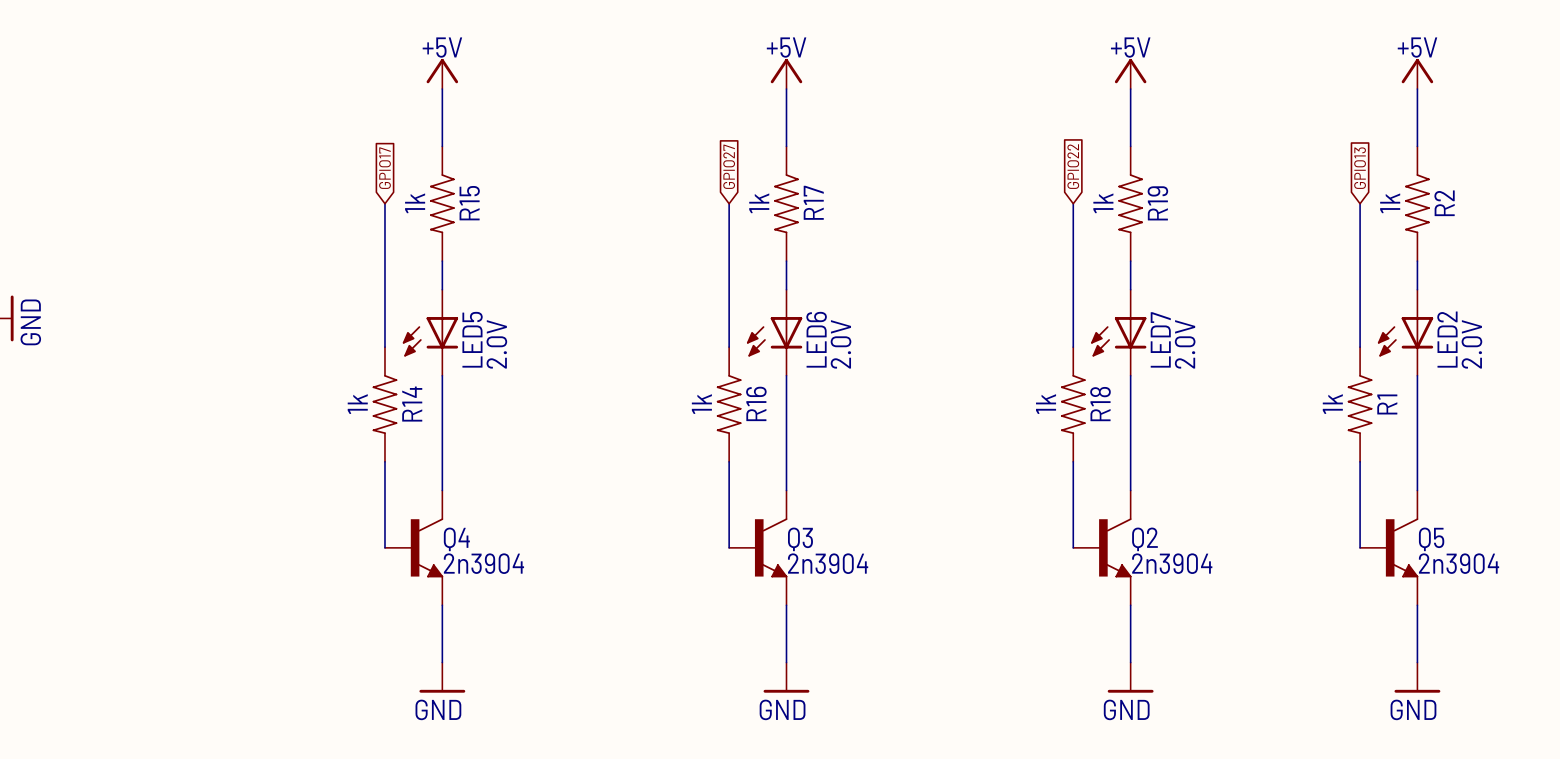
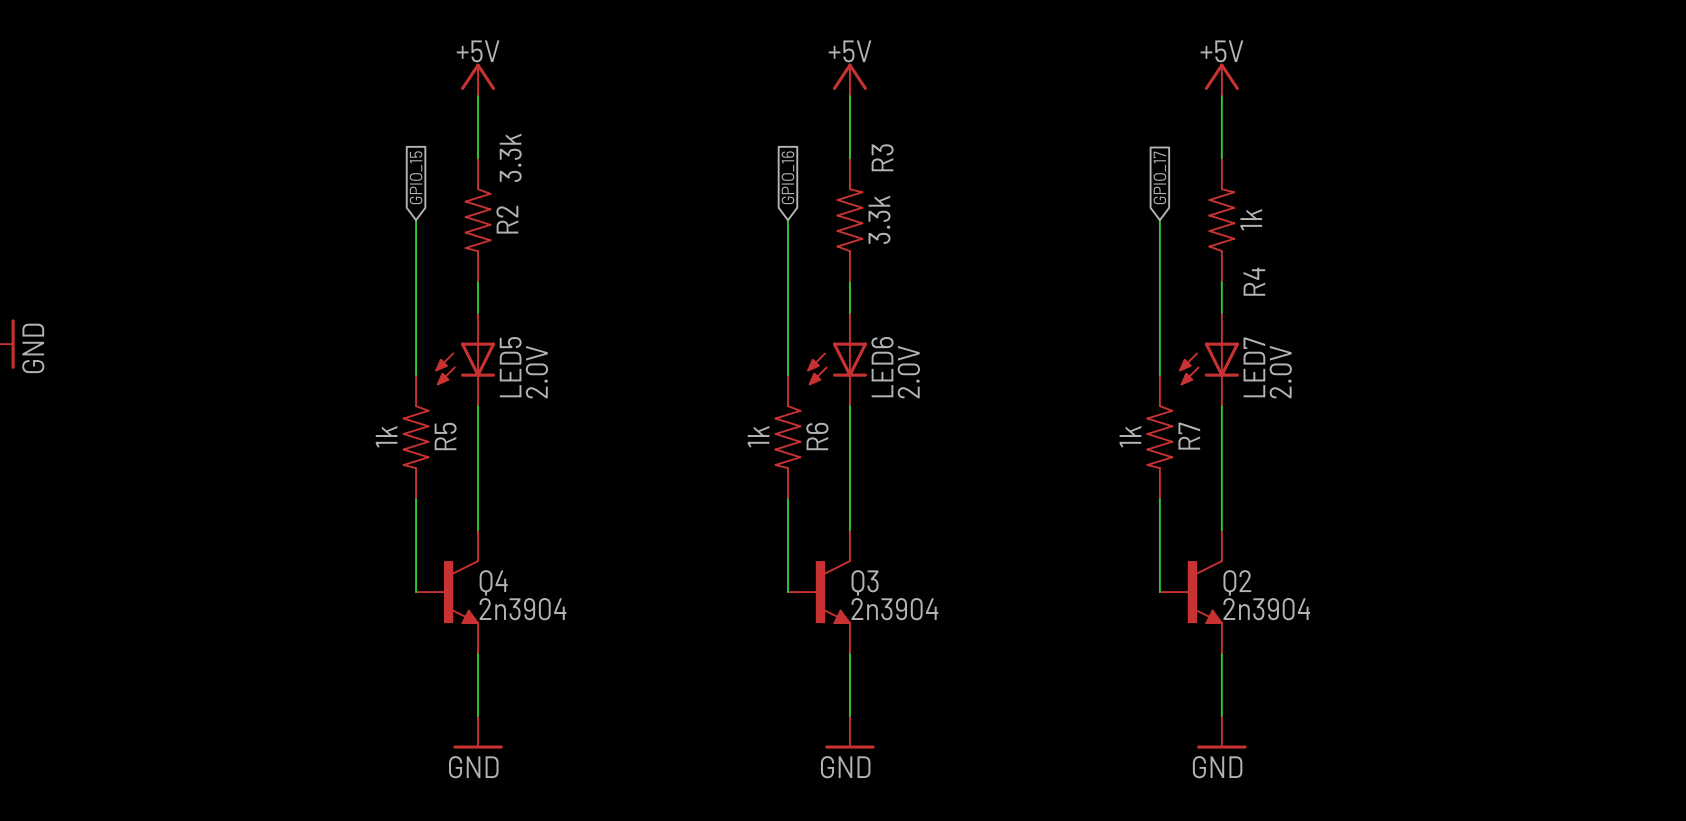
power symbol: +5V (1417, 73) -> none
wire: (1417, 89) (1417, 146) -> none
global label: GPIO27 (729, 166) -> GPIO_16 (787, 177)
global label: GPIO22 (1073, 166) -> GPIO_17 (1159, 177)
global label: GPIO17 (384, 168) -> GPIO_15 (416, 177)
global label: GPIO13 (1360, 168) -> none
R15 value: 1k (415, 203) -> 3.3k (510, 157)
R15 name: R15 (469, 203) -> R2 (507, 219)
R17: 1k (786, 203) -> none
R3: none -> 3.3k (849, 220)
R19: 1k (1130, 203) -> none
R4: none -> 1k (1221, 220)
wire: (1360, 203) (1360, 347) -> none
R2: 1k (1417, 203) -> none
wire: (1417, 261) (1417, 289) -> none
LED2: 2.0V (1405, 332) -> none
wire: (1417, 375) (1417, 490) -> none
R16 name: R16 (756, 403) -> R6 (817, 436)
R14 name: R14 (412, 404) -> R5 (445, 436)
R18 name: R18 (1100, 404) -> R7 (1189, 436)
R1: 1k (1360, 404) -> none
wire: (1360, 461) (1360, 547) -> none
Q5: 2n3904 (1389, 547) -> none
wire: (1417, 605) (1417, 662) -> none
power symbol: GND (1417, 677) -> none

